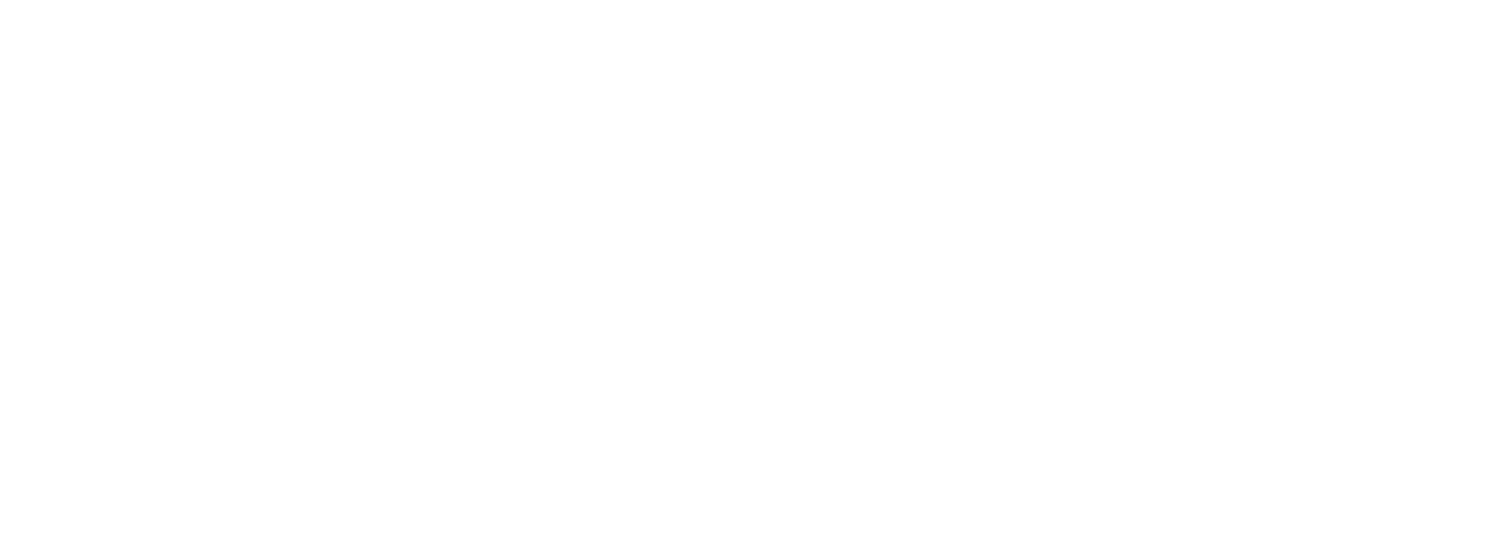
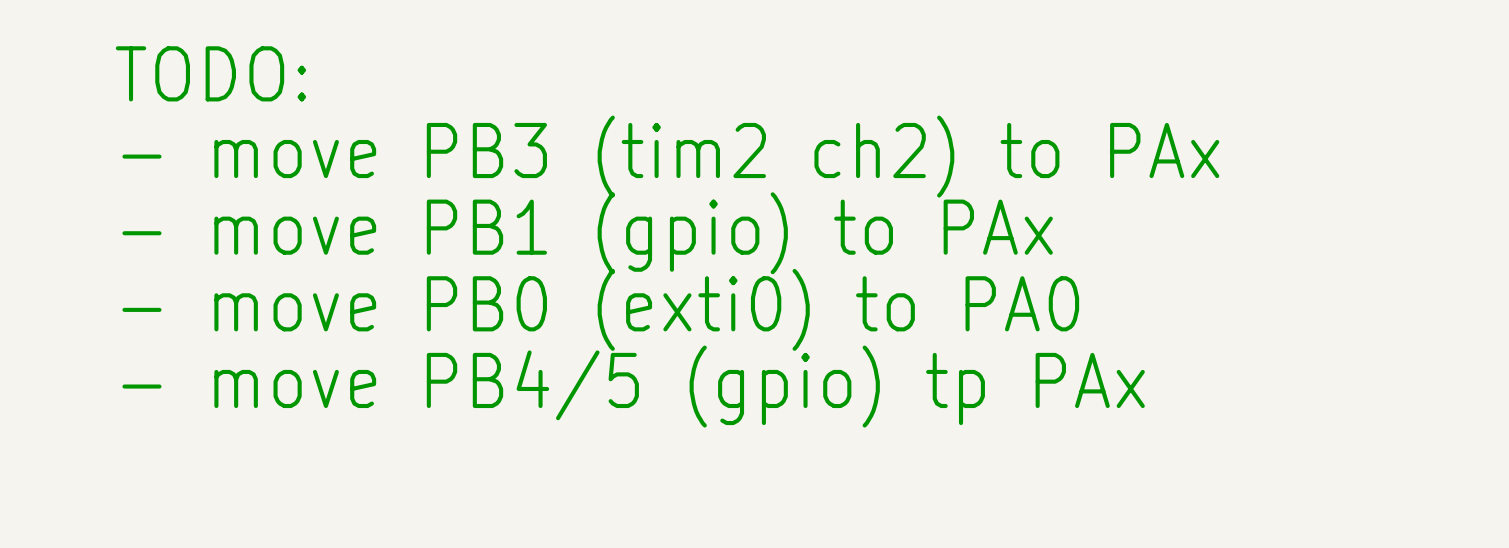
text: none -> TODO: (210, 73)
text: none -> - move PB3 (tim2 ch2) to PAx (670, 156)
text: none -> - move PB1 (gpio) to PAx (587, 233)
text: none -> - move PB0 (exti0) to PA0 (600, 309)
text: none -> - move PB4/5 (gpio) tp PAx (633, 386)

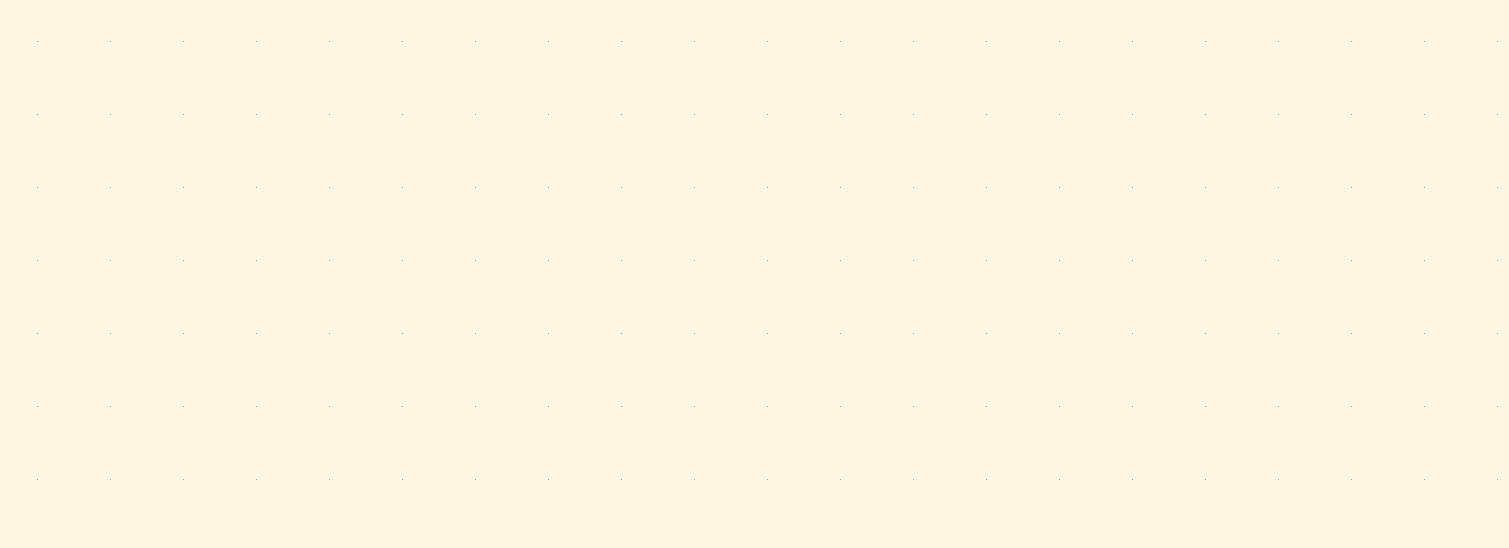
text: TODO: (210, 73) -> none
text: - move PB3 (tim2 ch2) to PAx (670, 156) -> none
text: - move PB1 (gpio) to PAx (587, 233) -> none
text: - move PB0 (exti0) to PA0 (600, 309) -> none
text: - move PB4/5 (gpio) tp PAx (633, 386) -> none

